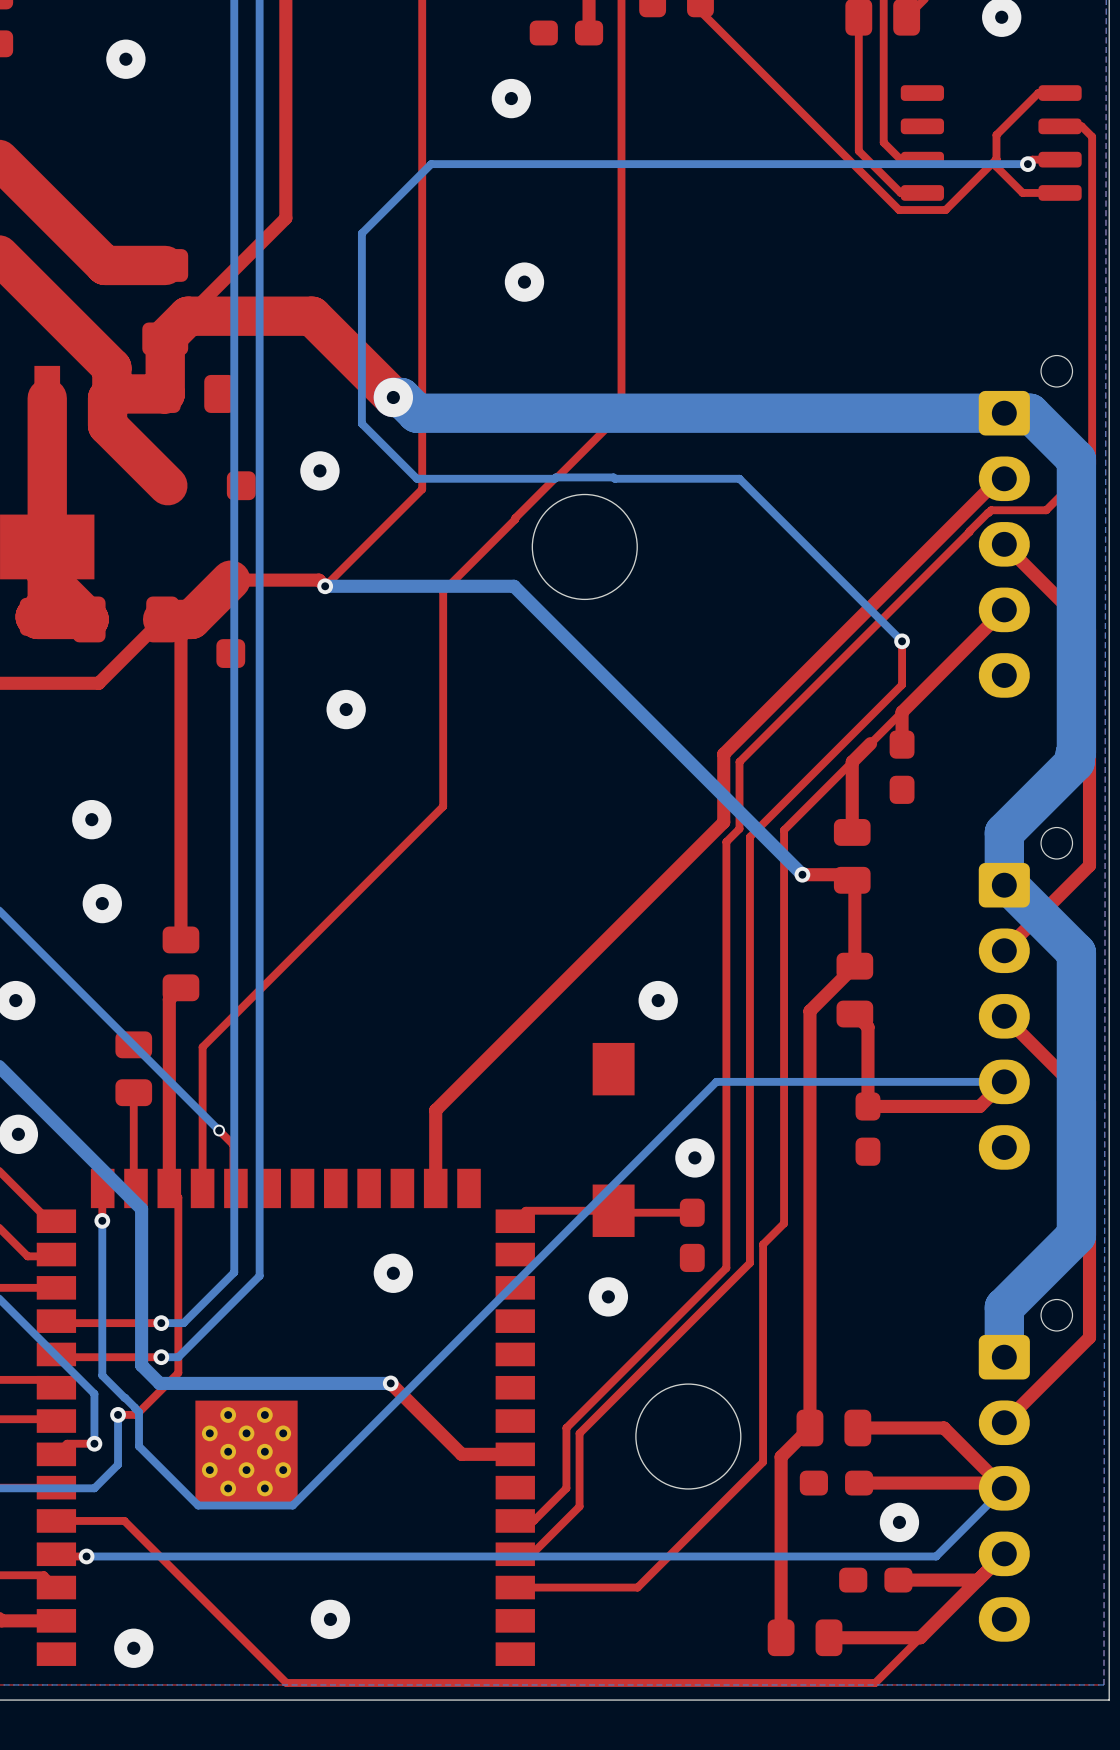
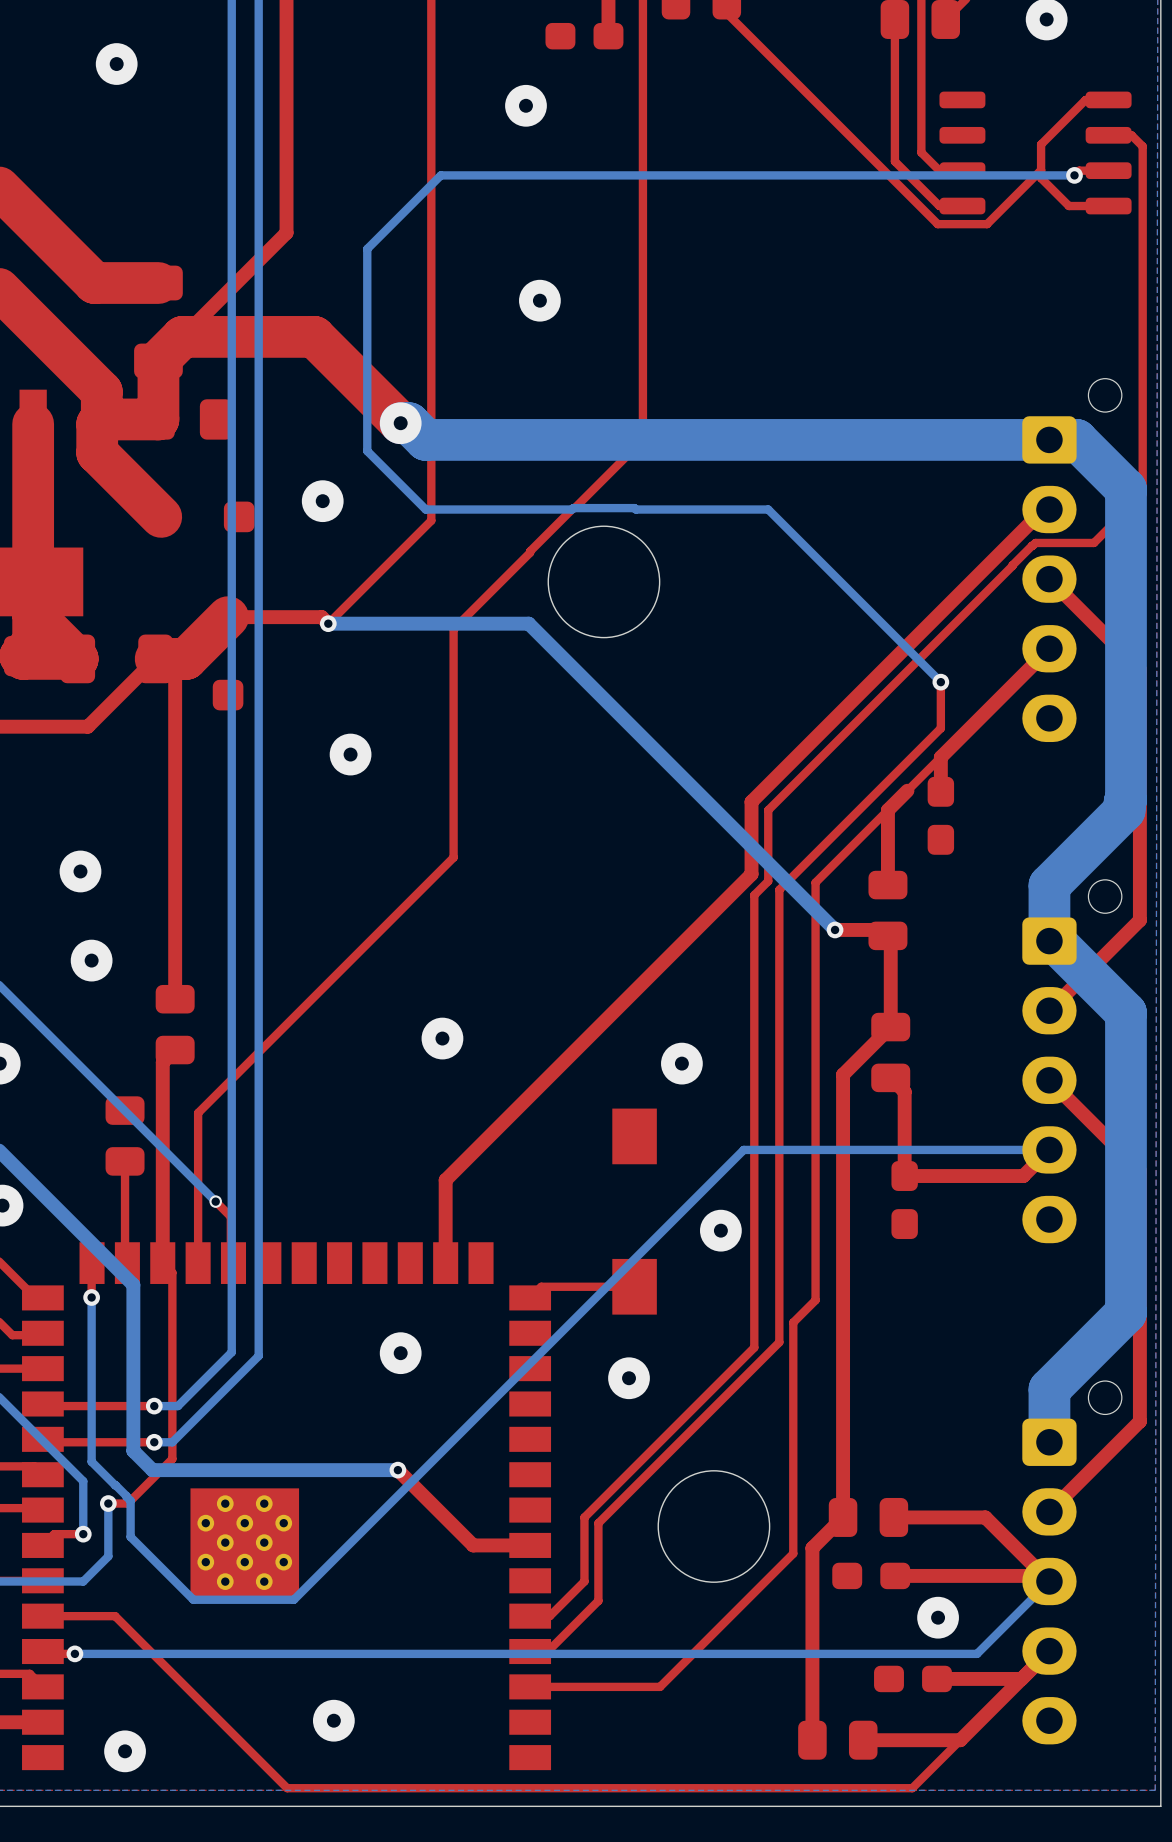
via: none -> (442, 1038)
top track: (692, 1212) (615, 1212) -> none
part: (692, 1235) -> none

